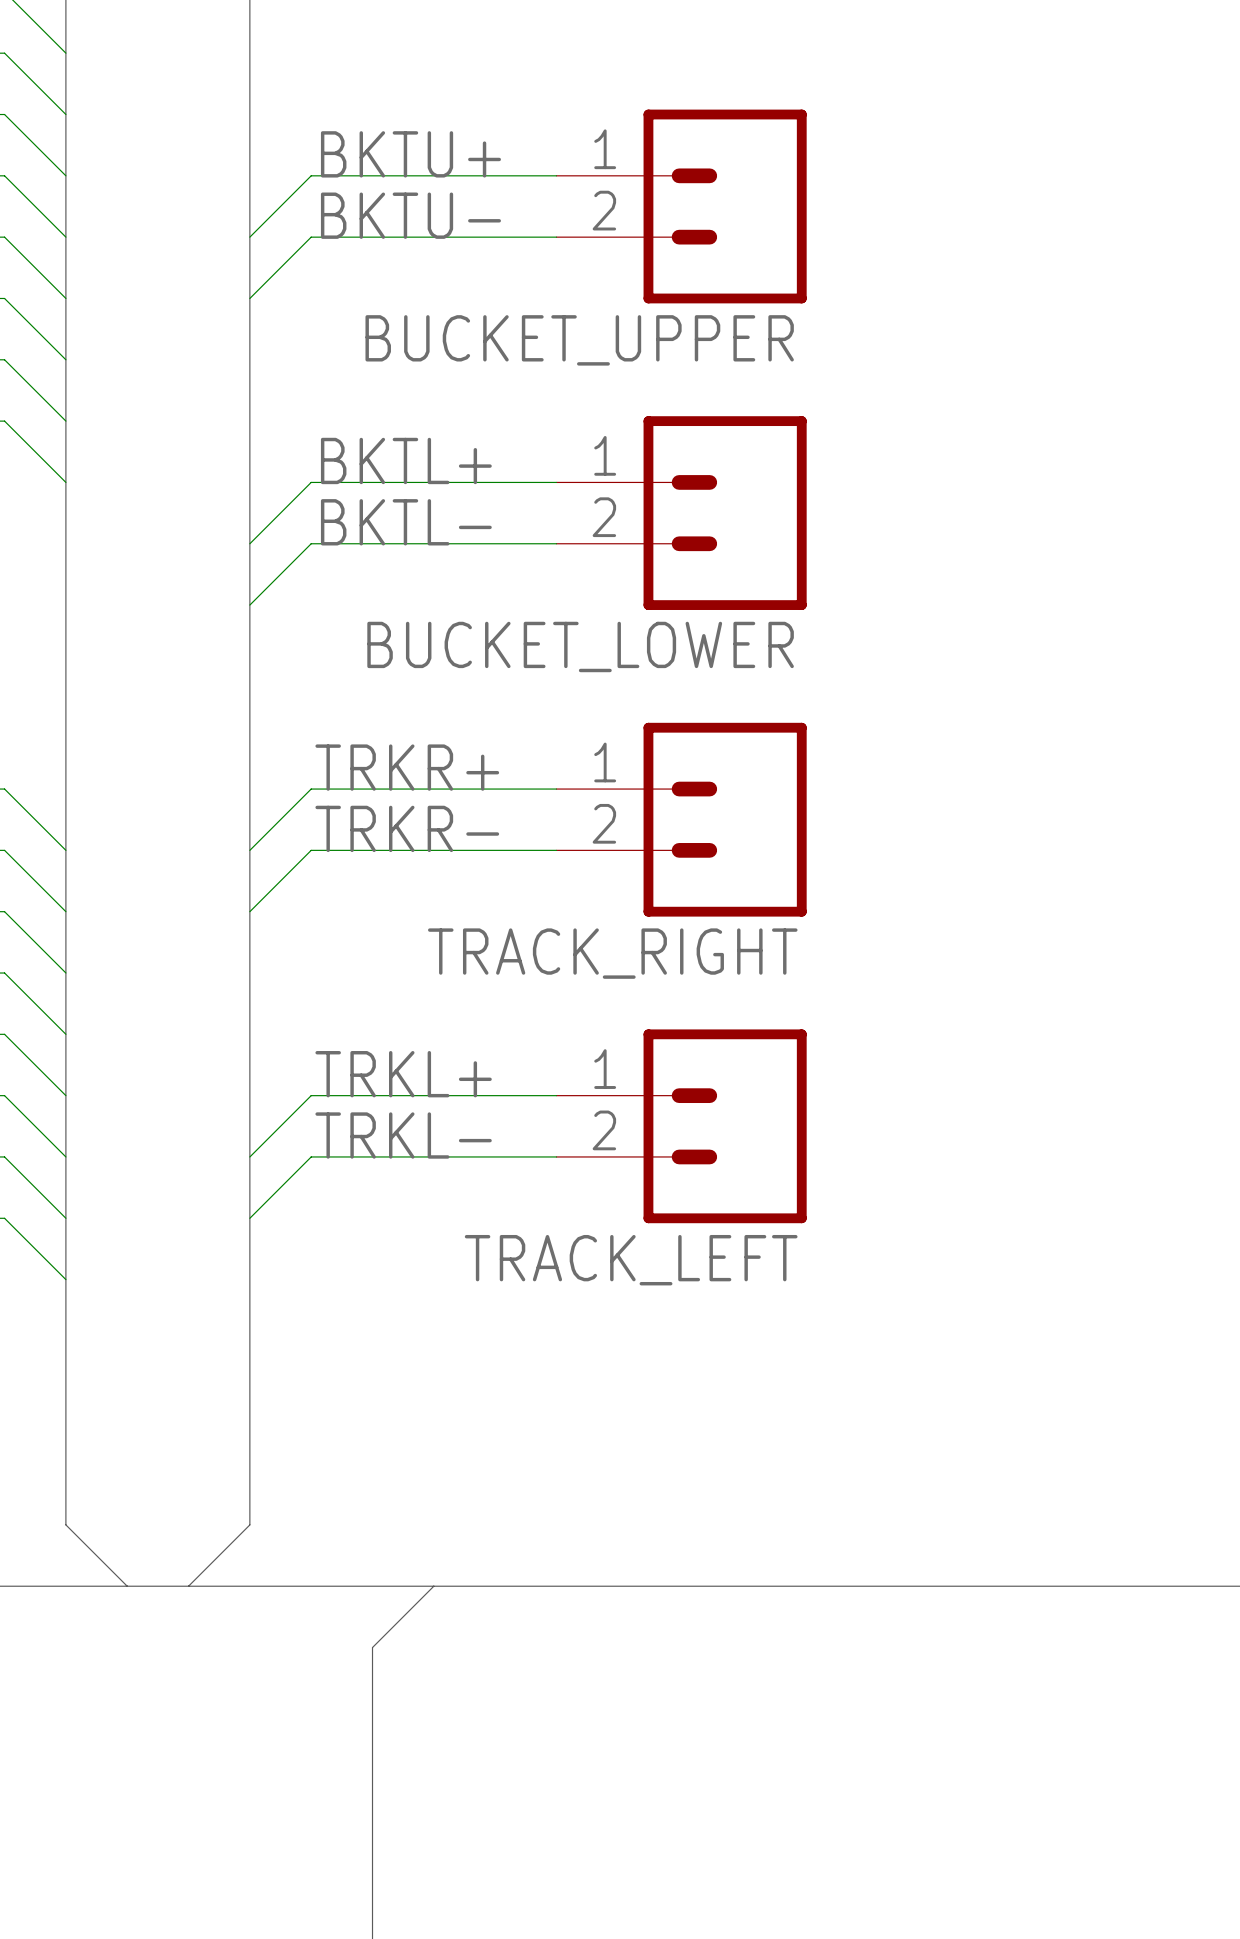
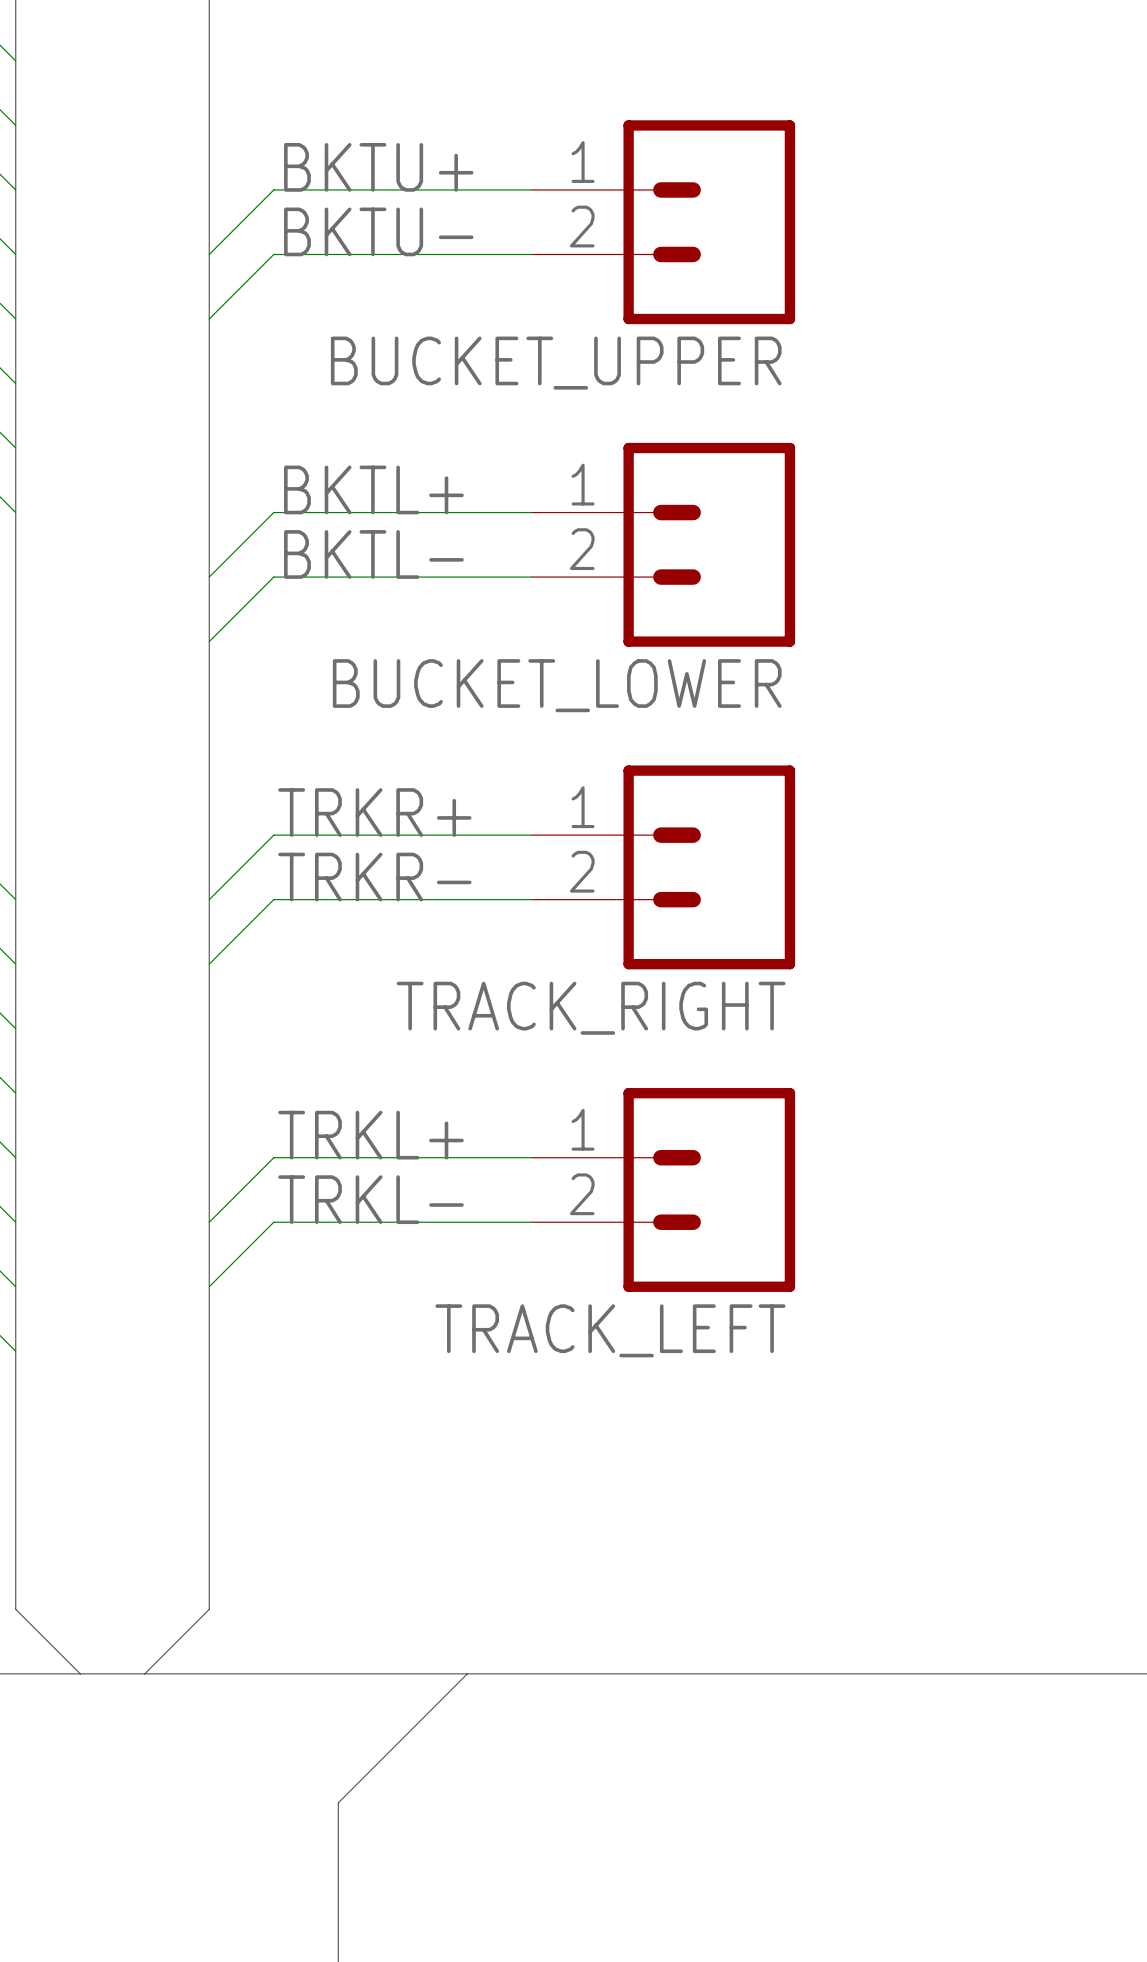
bus: (433, 1586) (372, 1647) (372, 1708) -> (467, 1673) (338, 1802)

